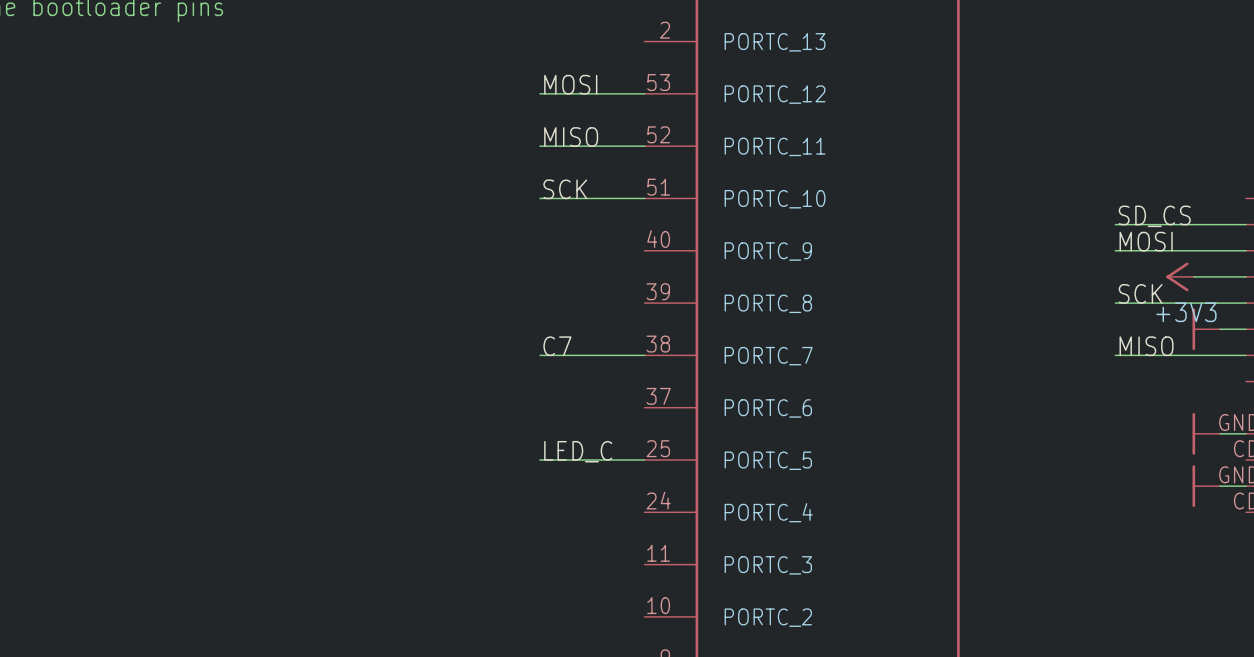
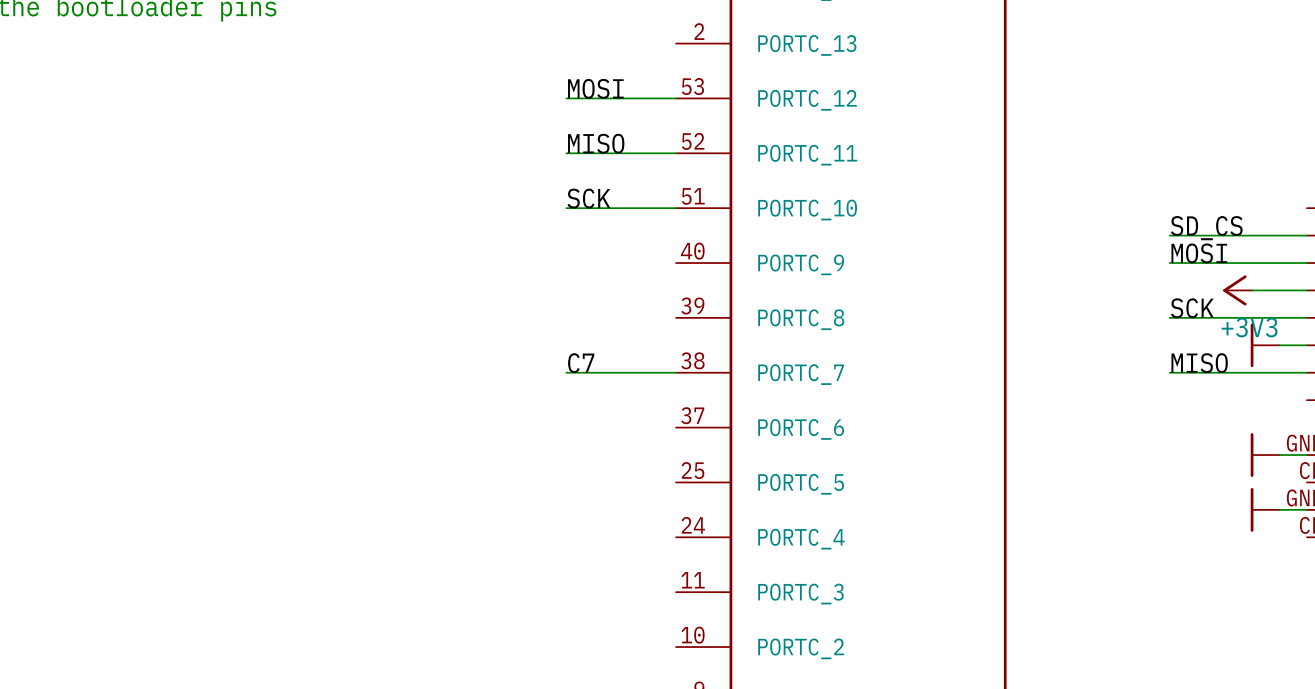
label: LED_C (578, 451) -> none
wire: (539, 459) (644, 459) -> none

